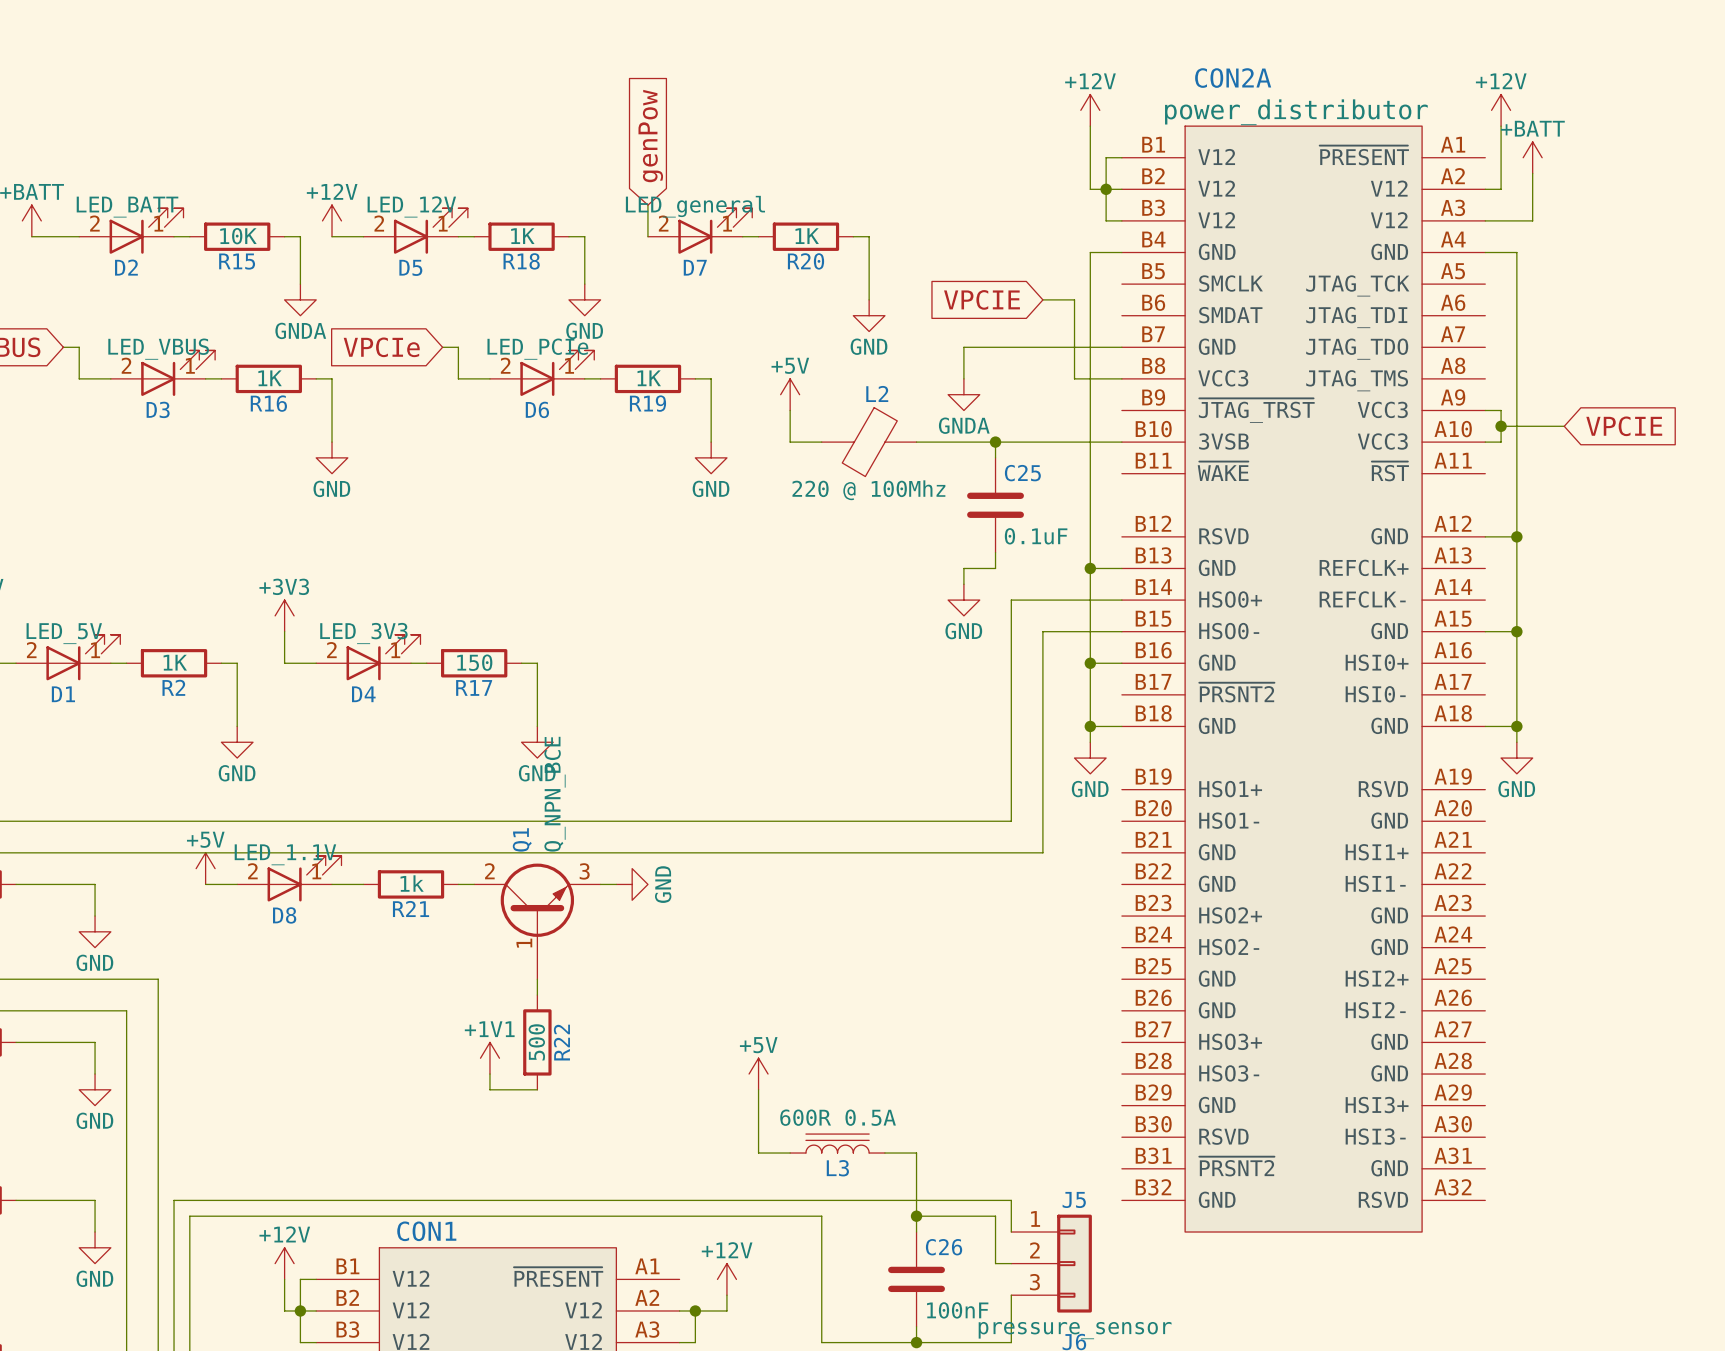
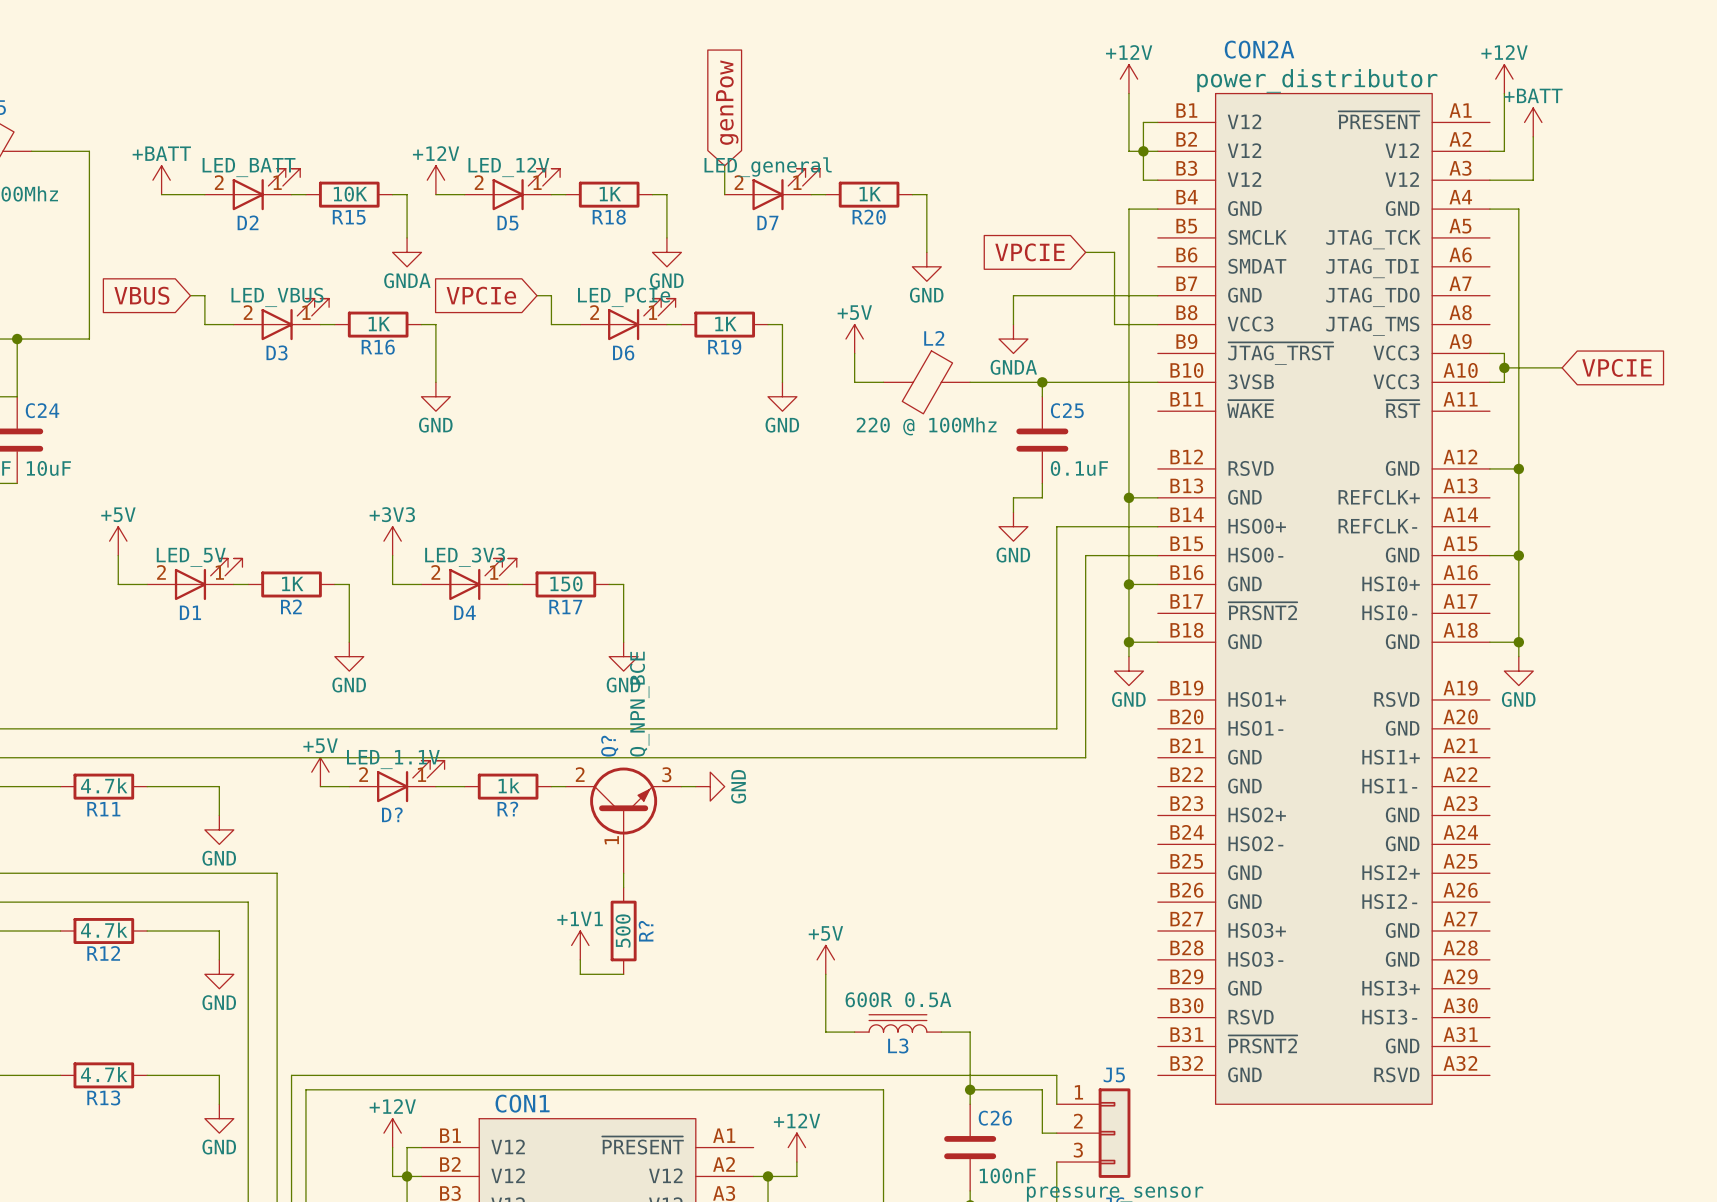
Q1 name: Q1 (522, 839) -> Q? (609, 746)
R21 name: R21 (411, 908) -> R? (507, 809)
D8 name: D8 (284, 915) -> D? (392, 814)
R22 name: R22 (561, 1042) -> R? (646, 931)

